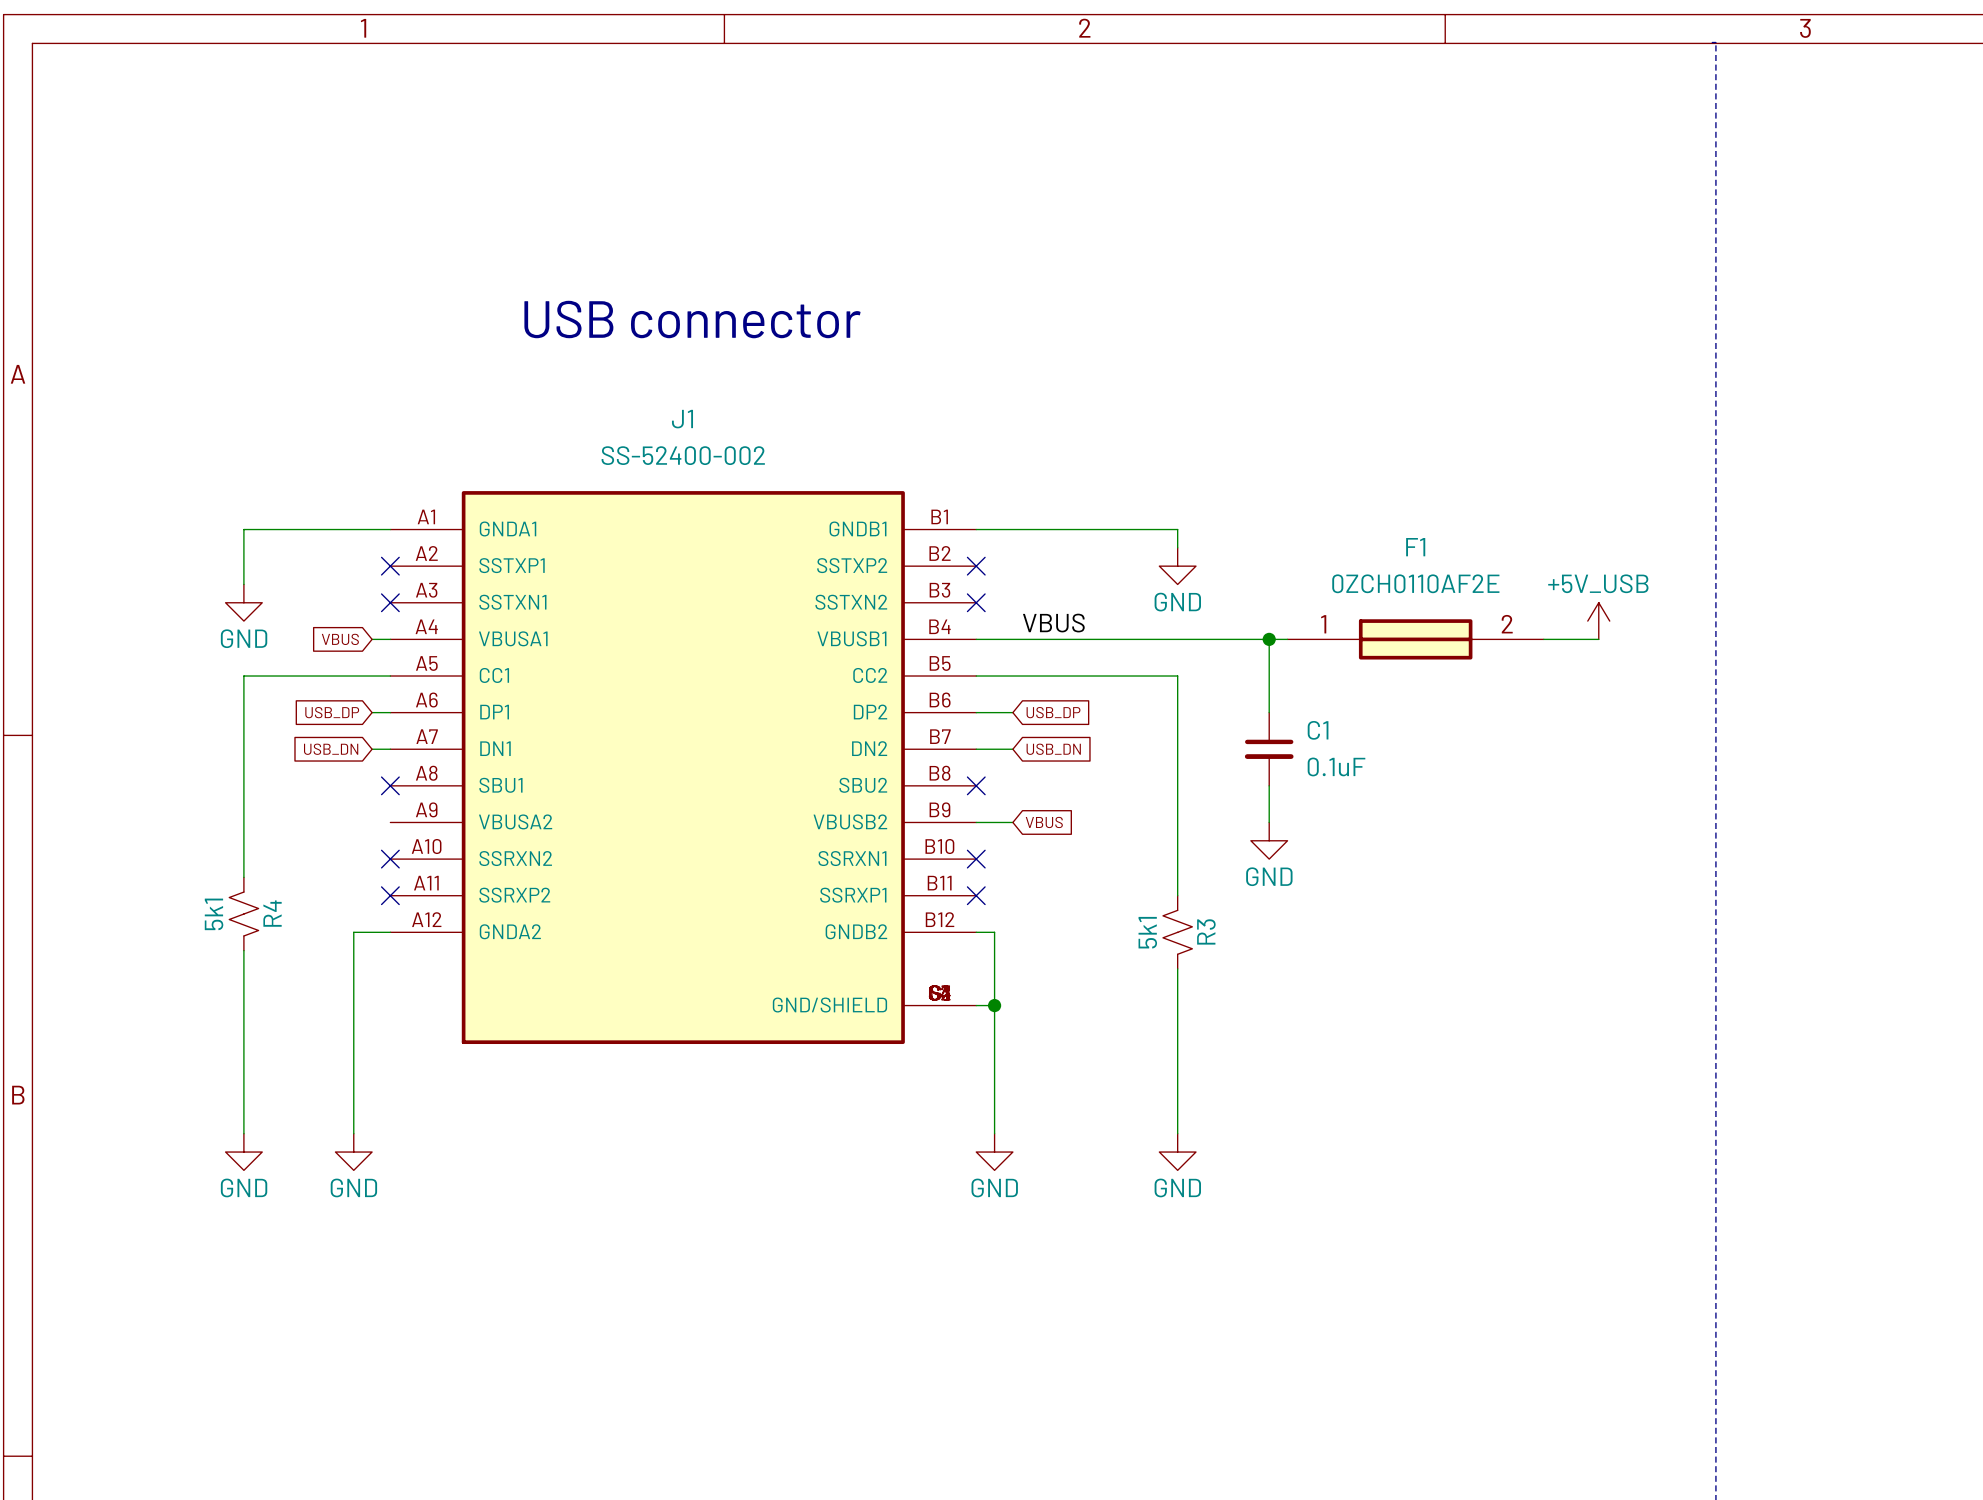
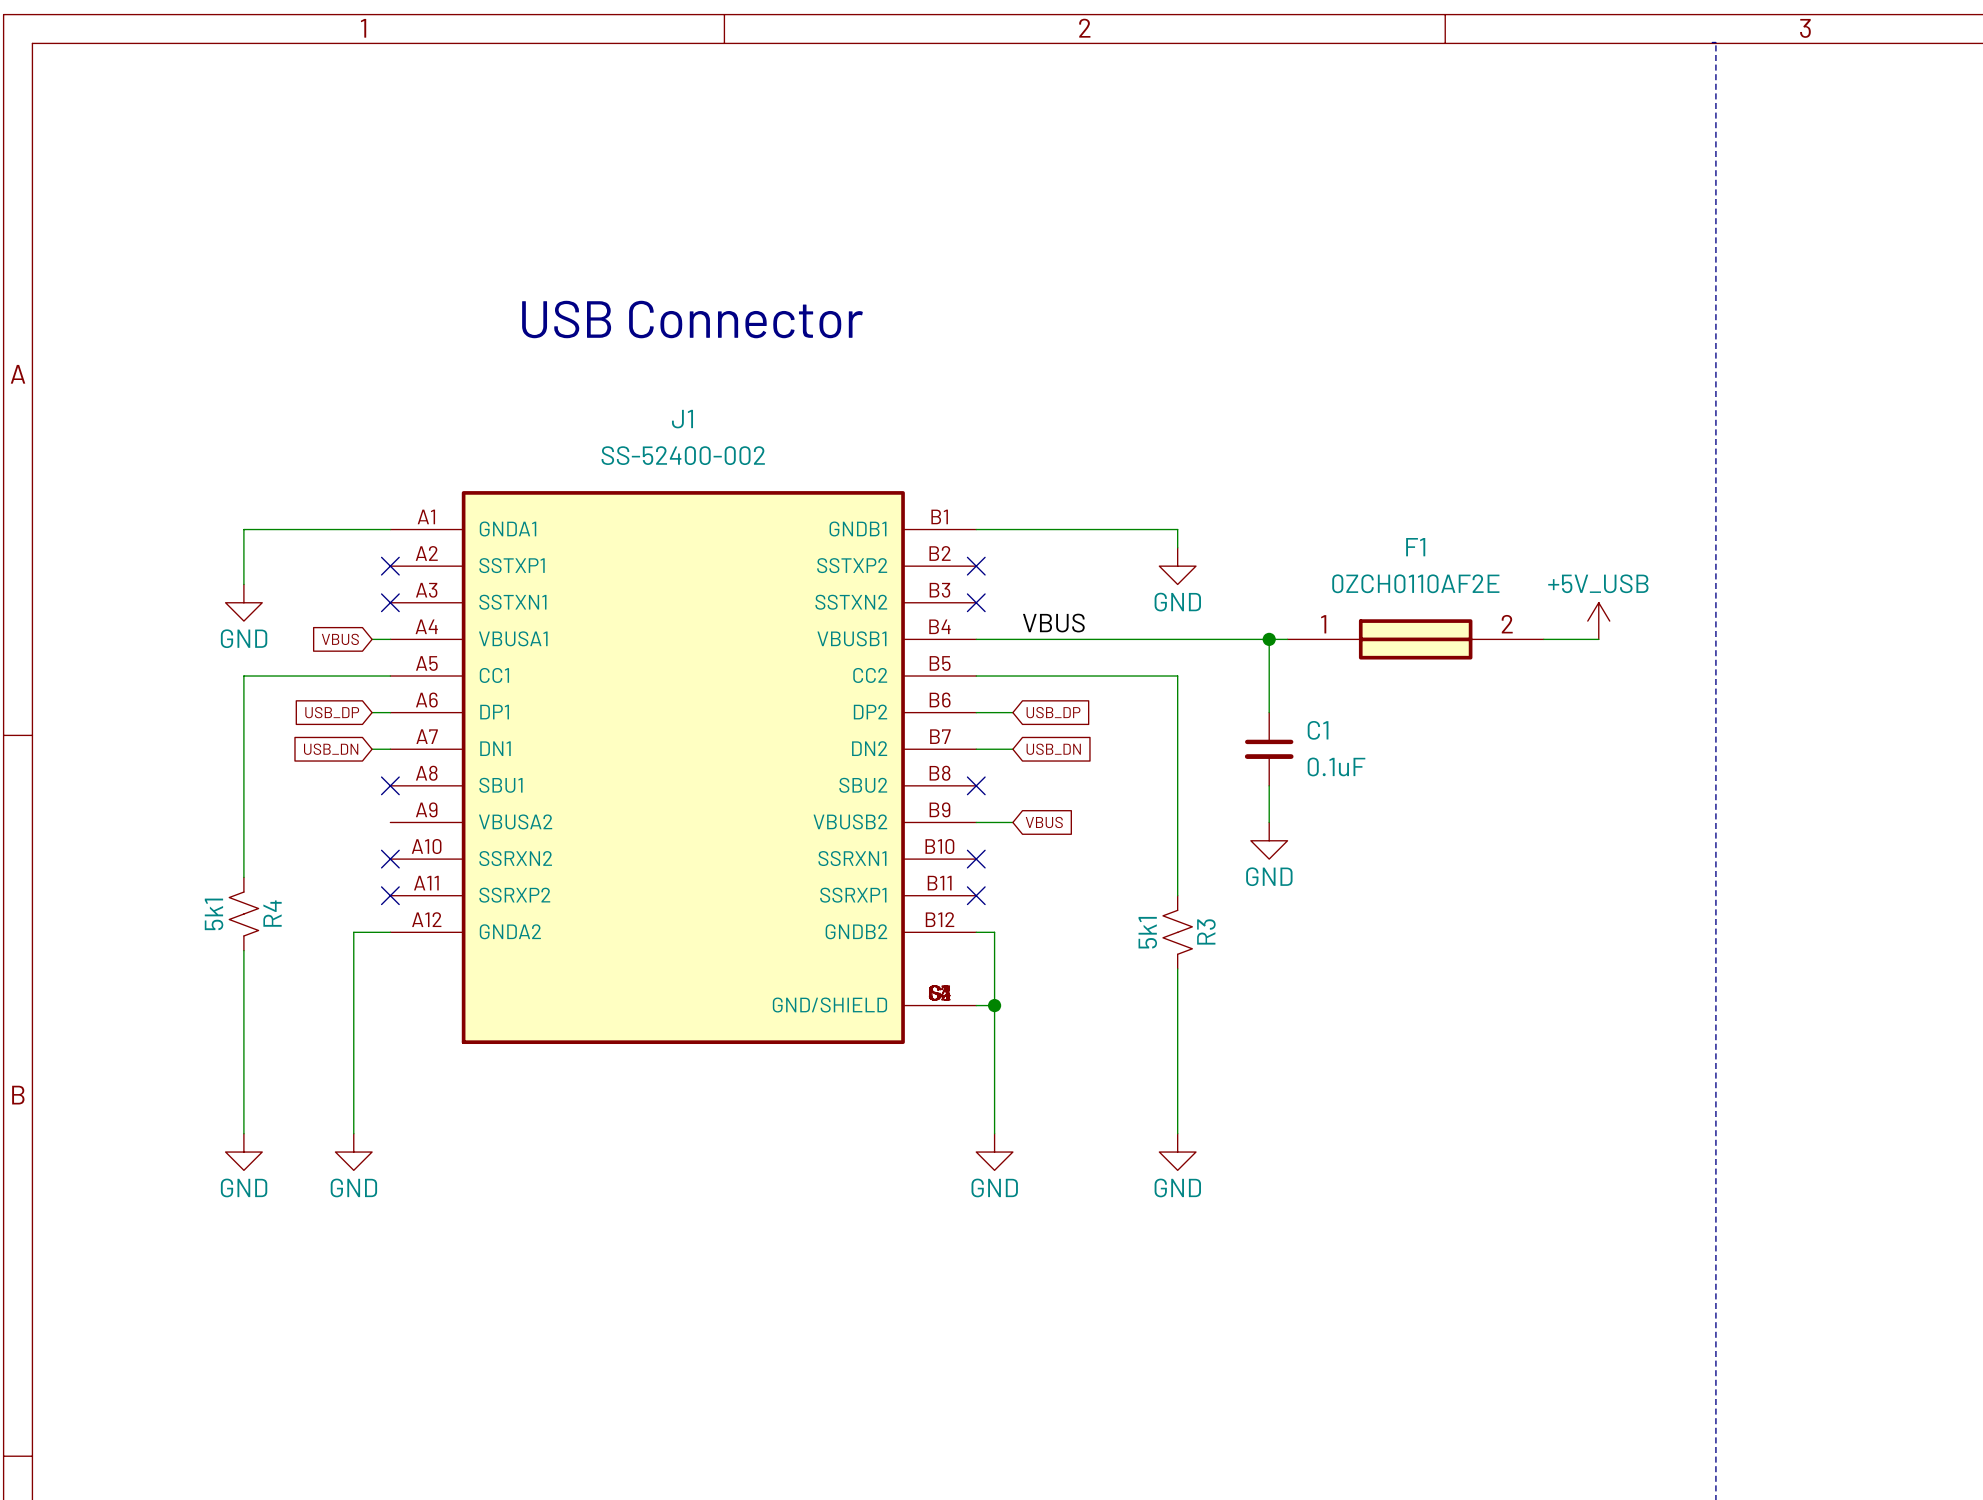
text: USB connector (692, 319) -> USB Connector (692, 319)

